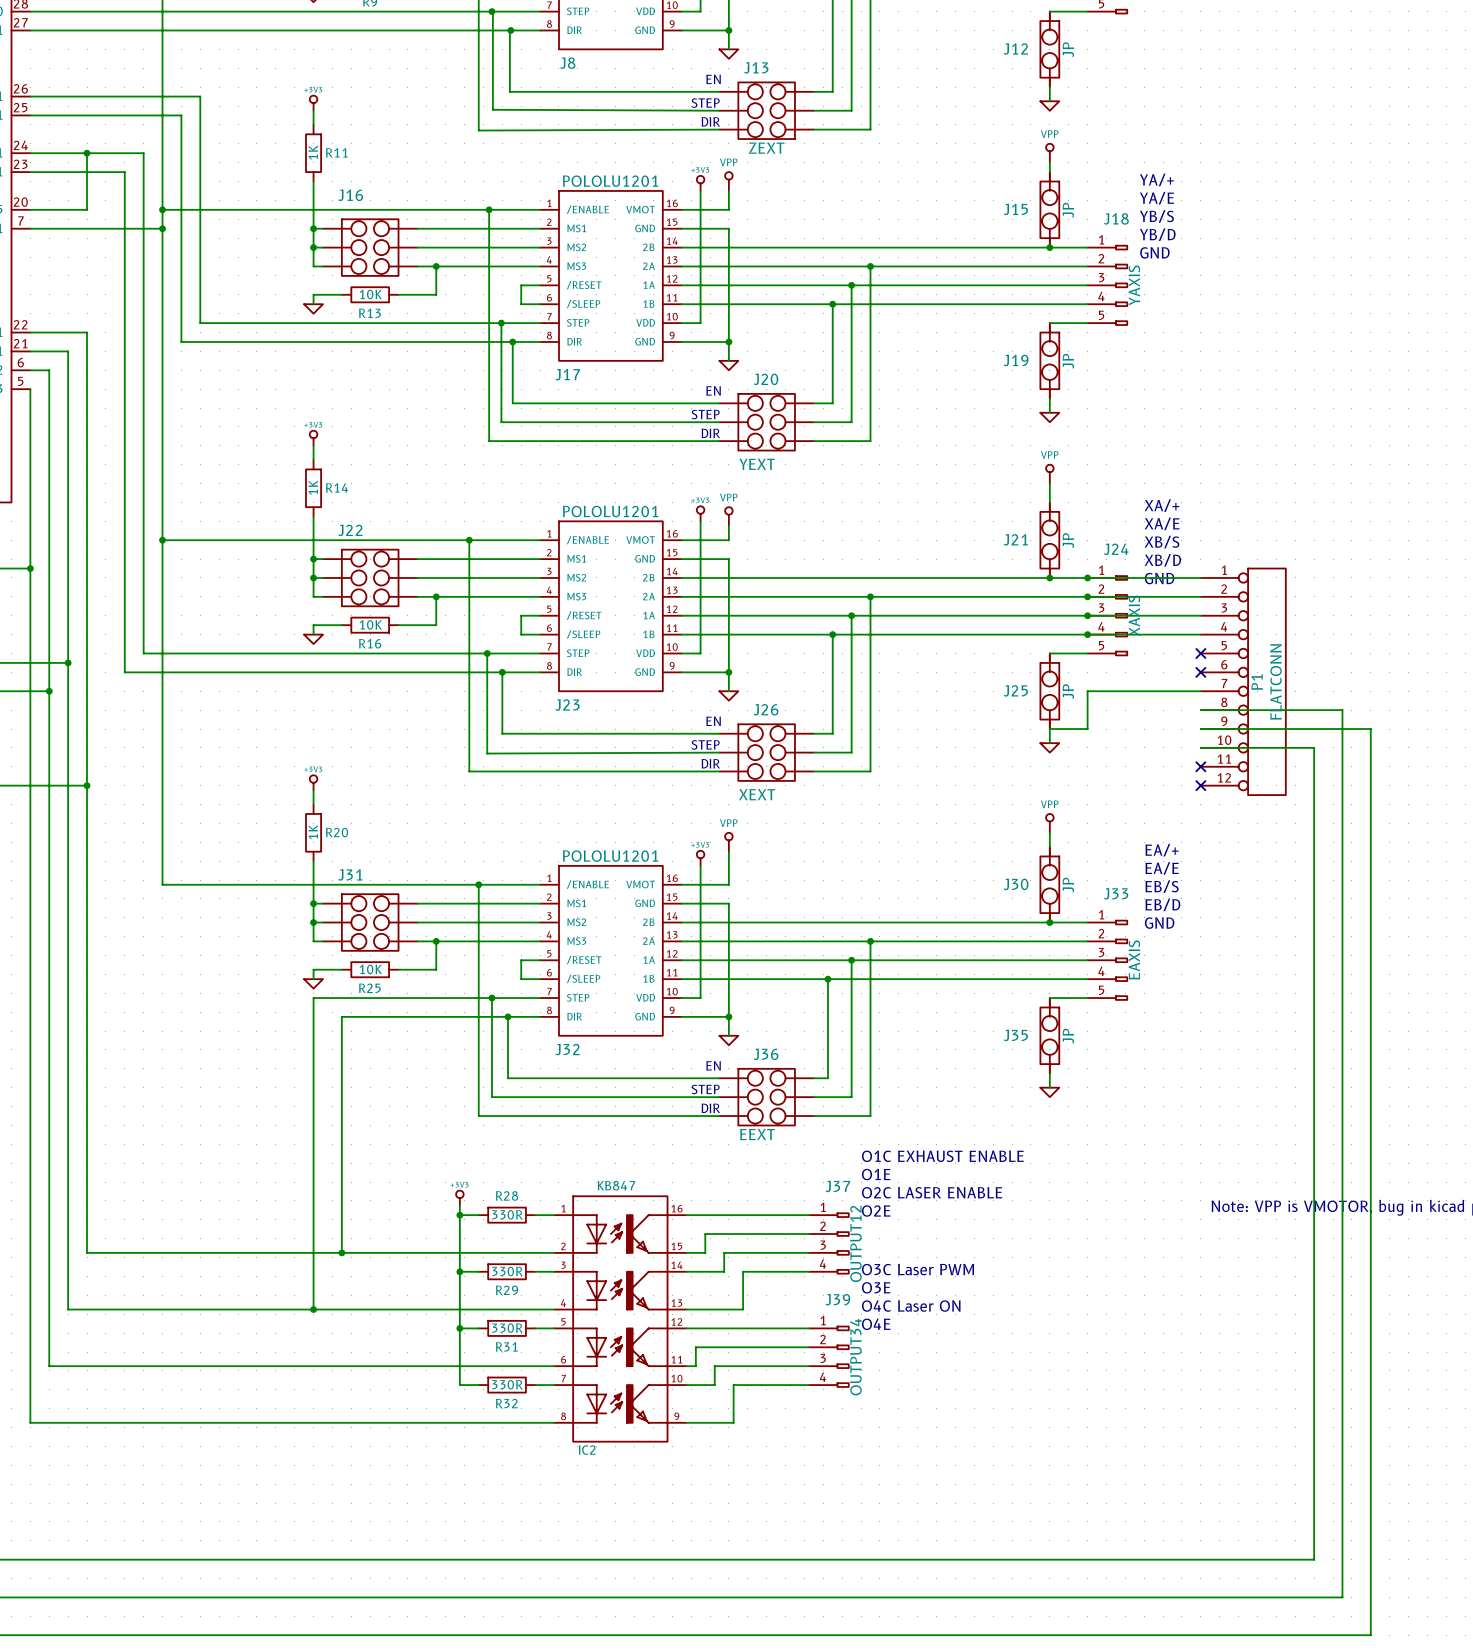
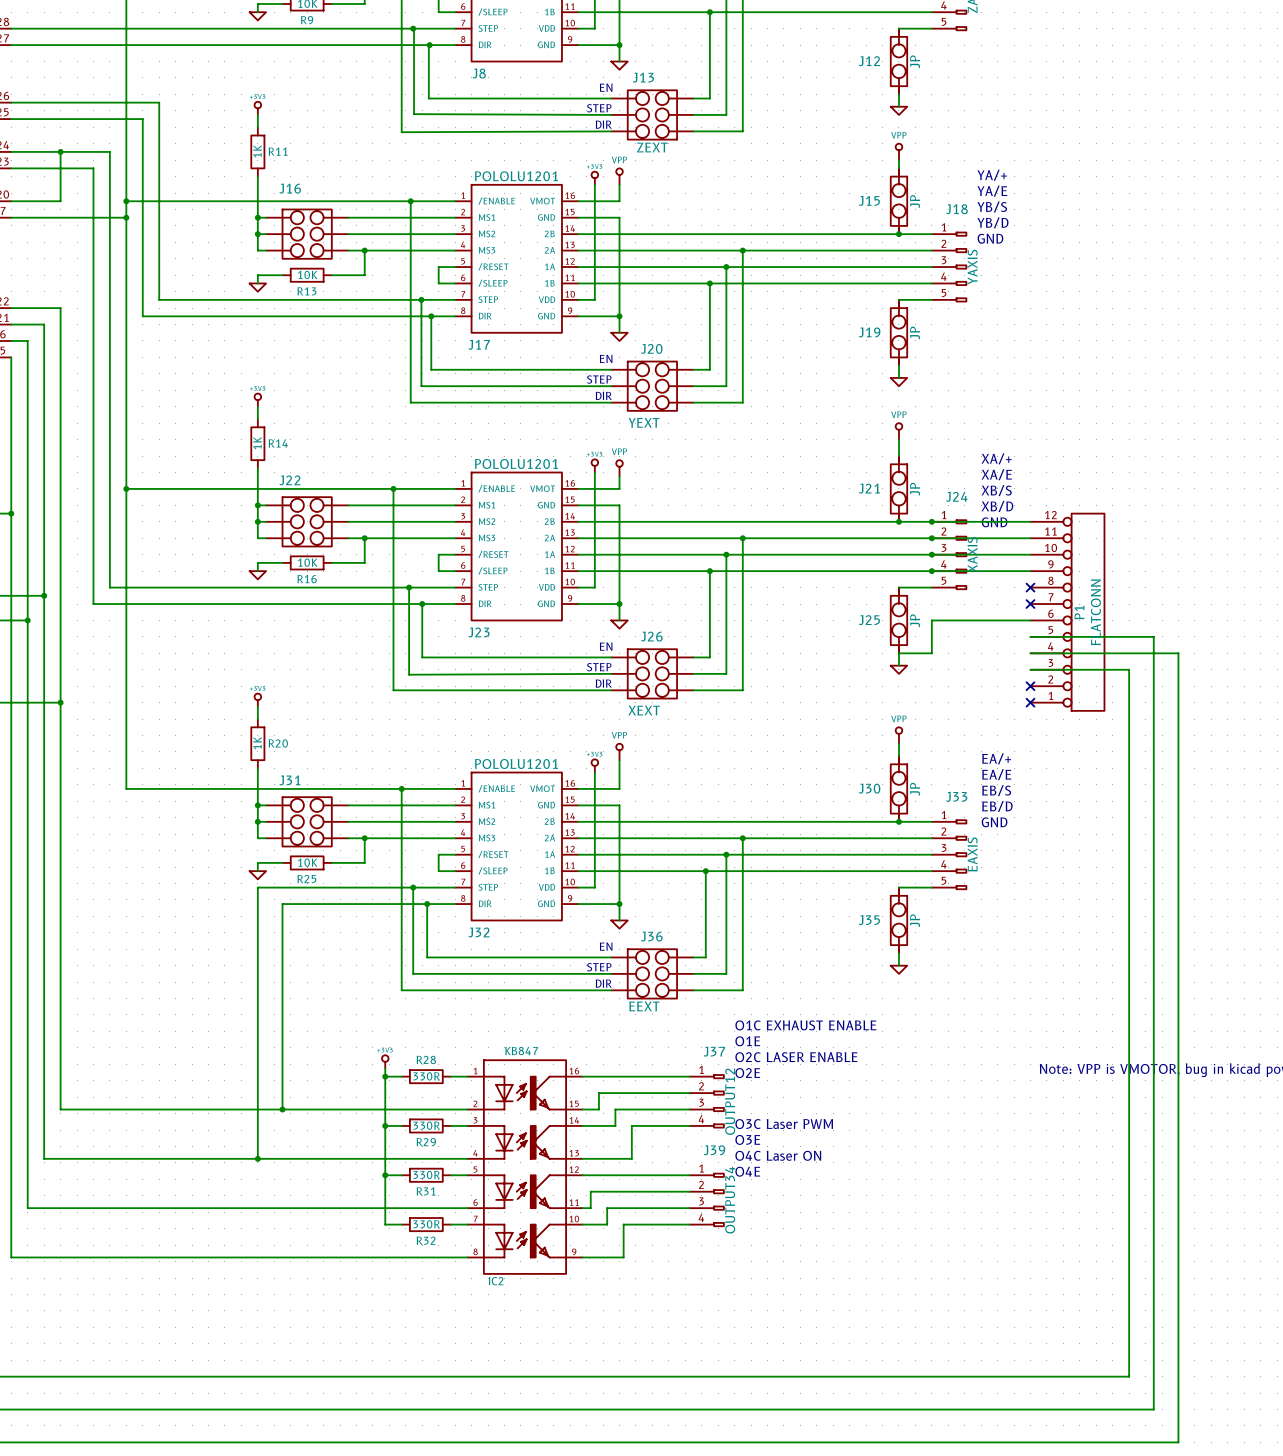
P1 flip: as is (1266, 681) -> up-down (1088, 612)

